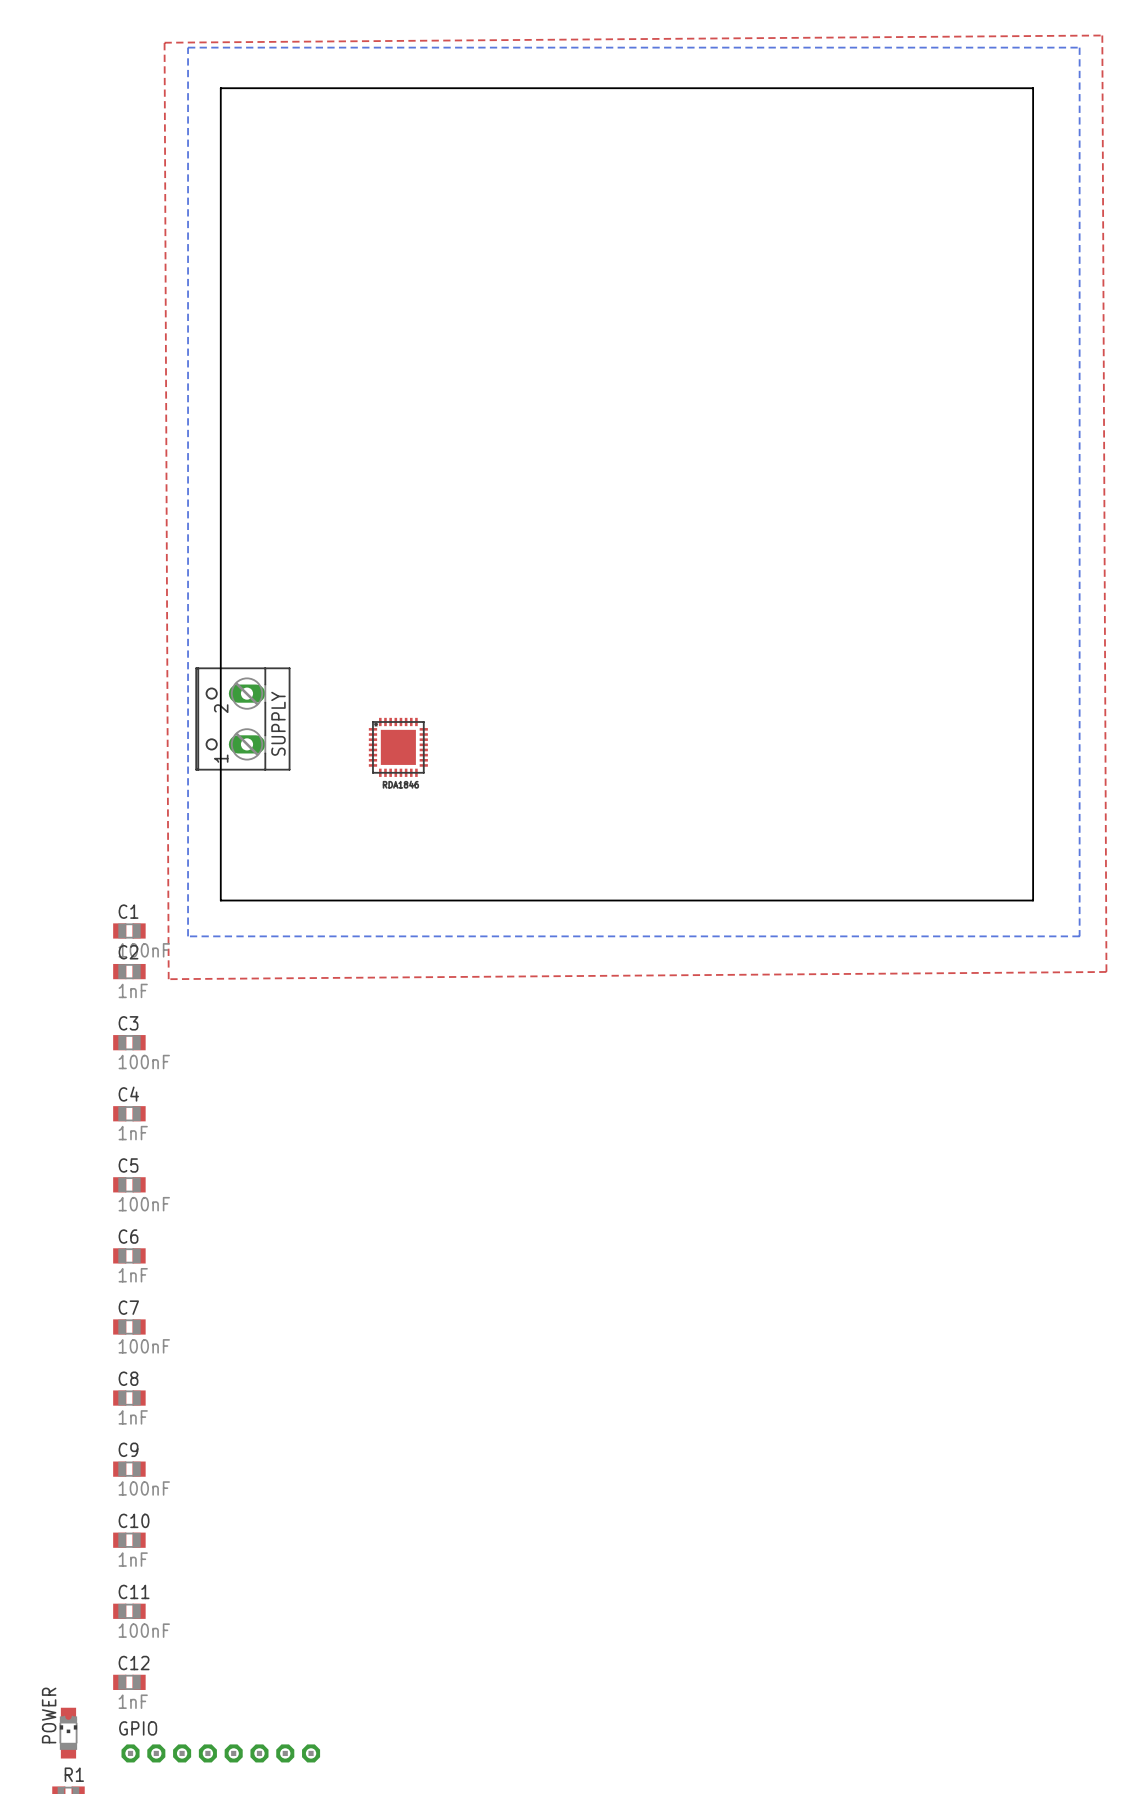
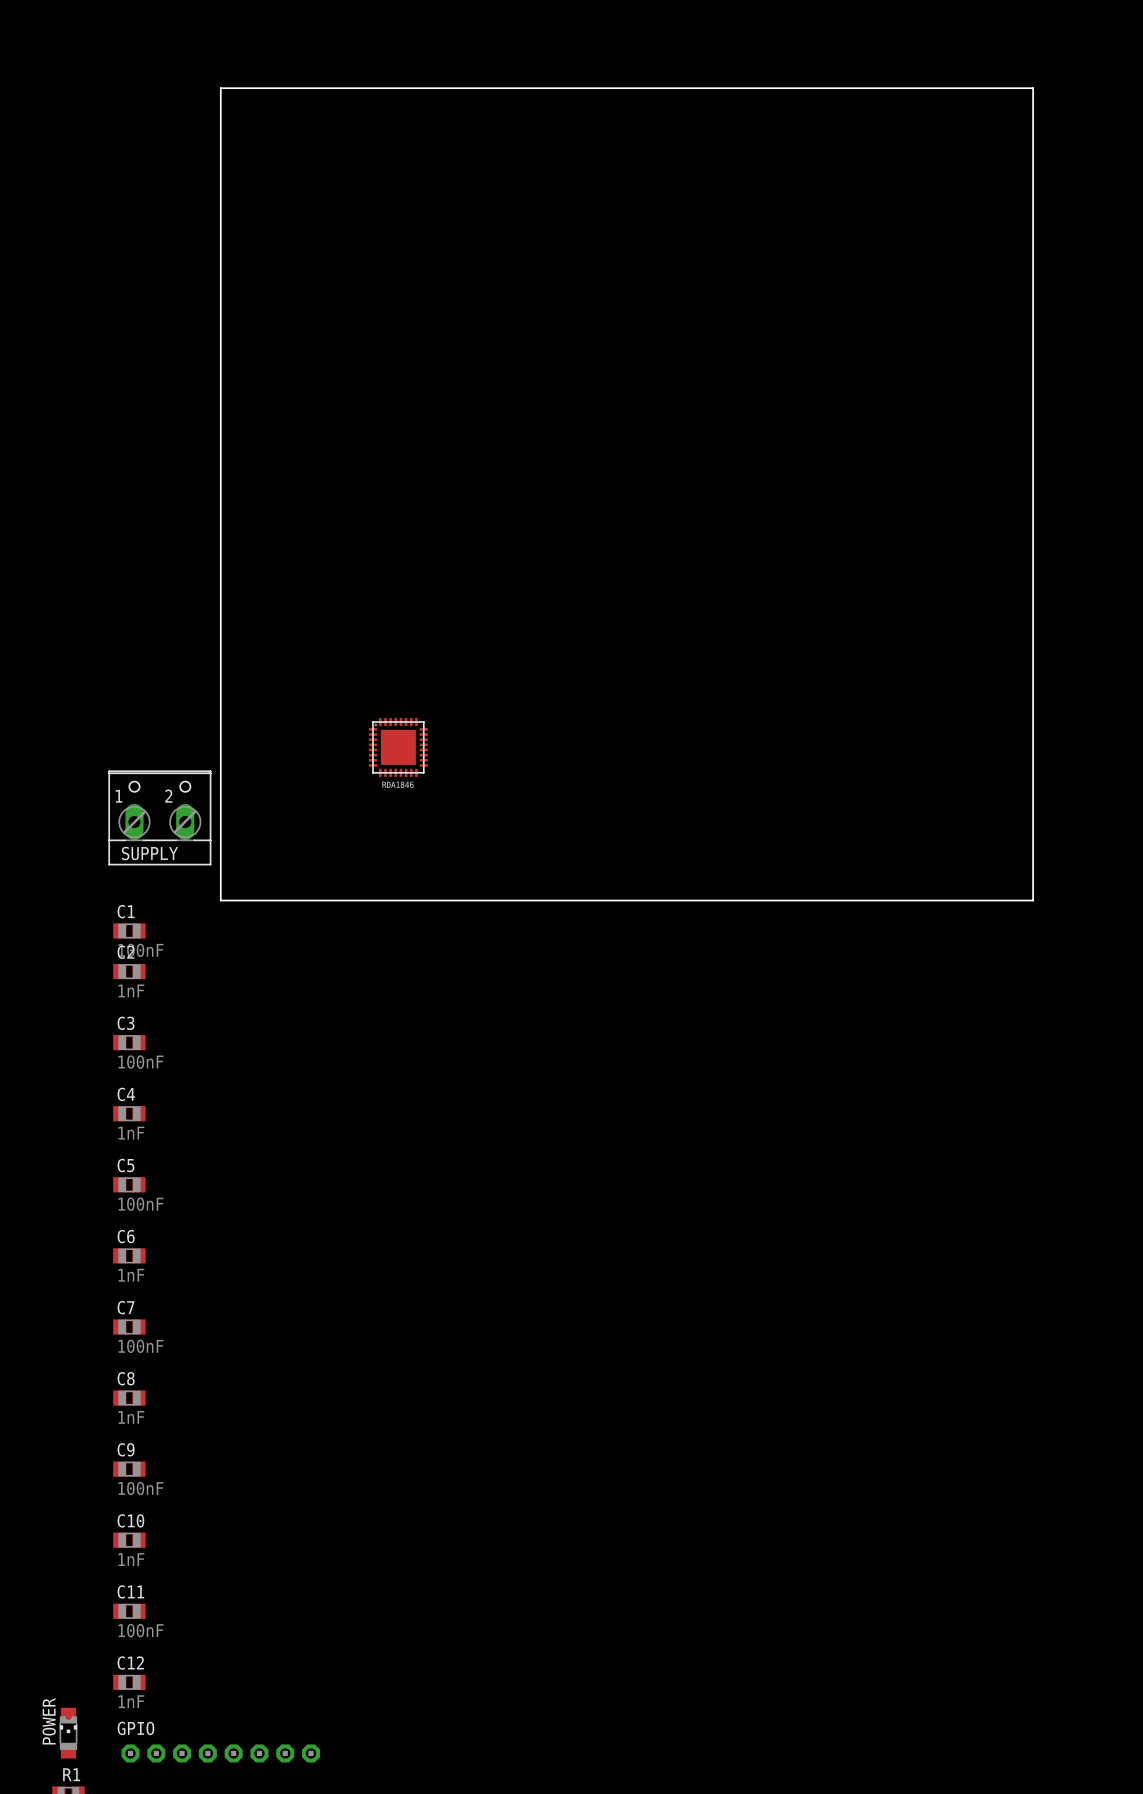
top zone outline: (1102, 35) (164, 42) (168, 979) (1106, 971) (1102, 35) -> none
bottom zone outline: (188, 47) (1079, 47) (1079, 936) (188, 936) (188, 47) -> none
SUPPLY rotation: 0° (242, 718) -> 90° clockwise (159, 817)
SUPPLY position: (242, 718) -> (159, 817)

